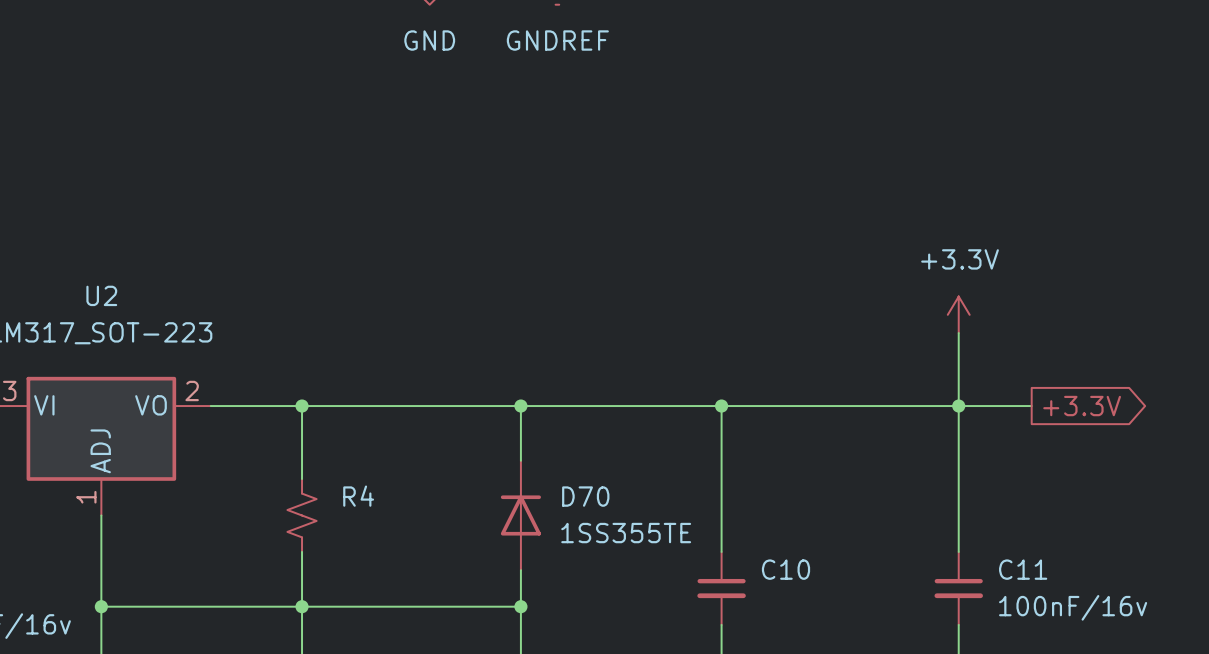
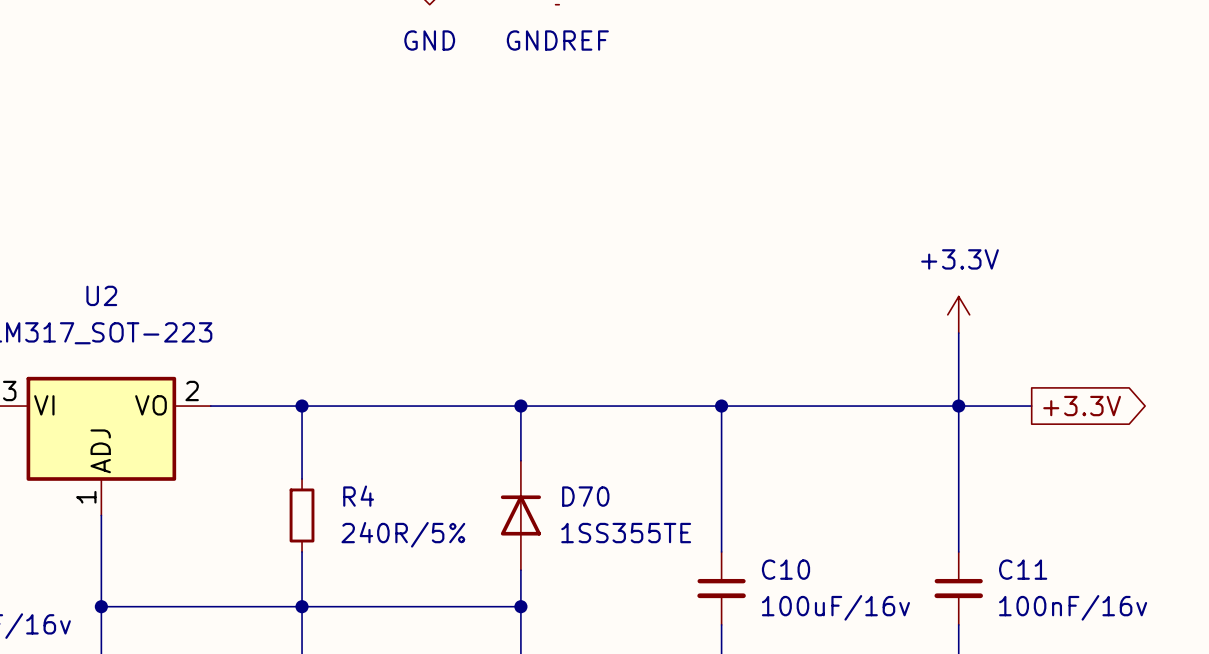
R4 symbol: [287, 479, 317, 552] -> [289, 479, 315, 552]
R4 value: none -> 240R/5% (403, 534)
C10 value: none -> 100uF/16v (835, 607)

